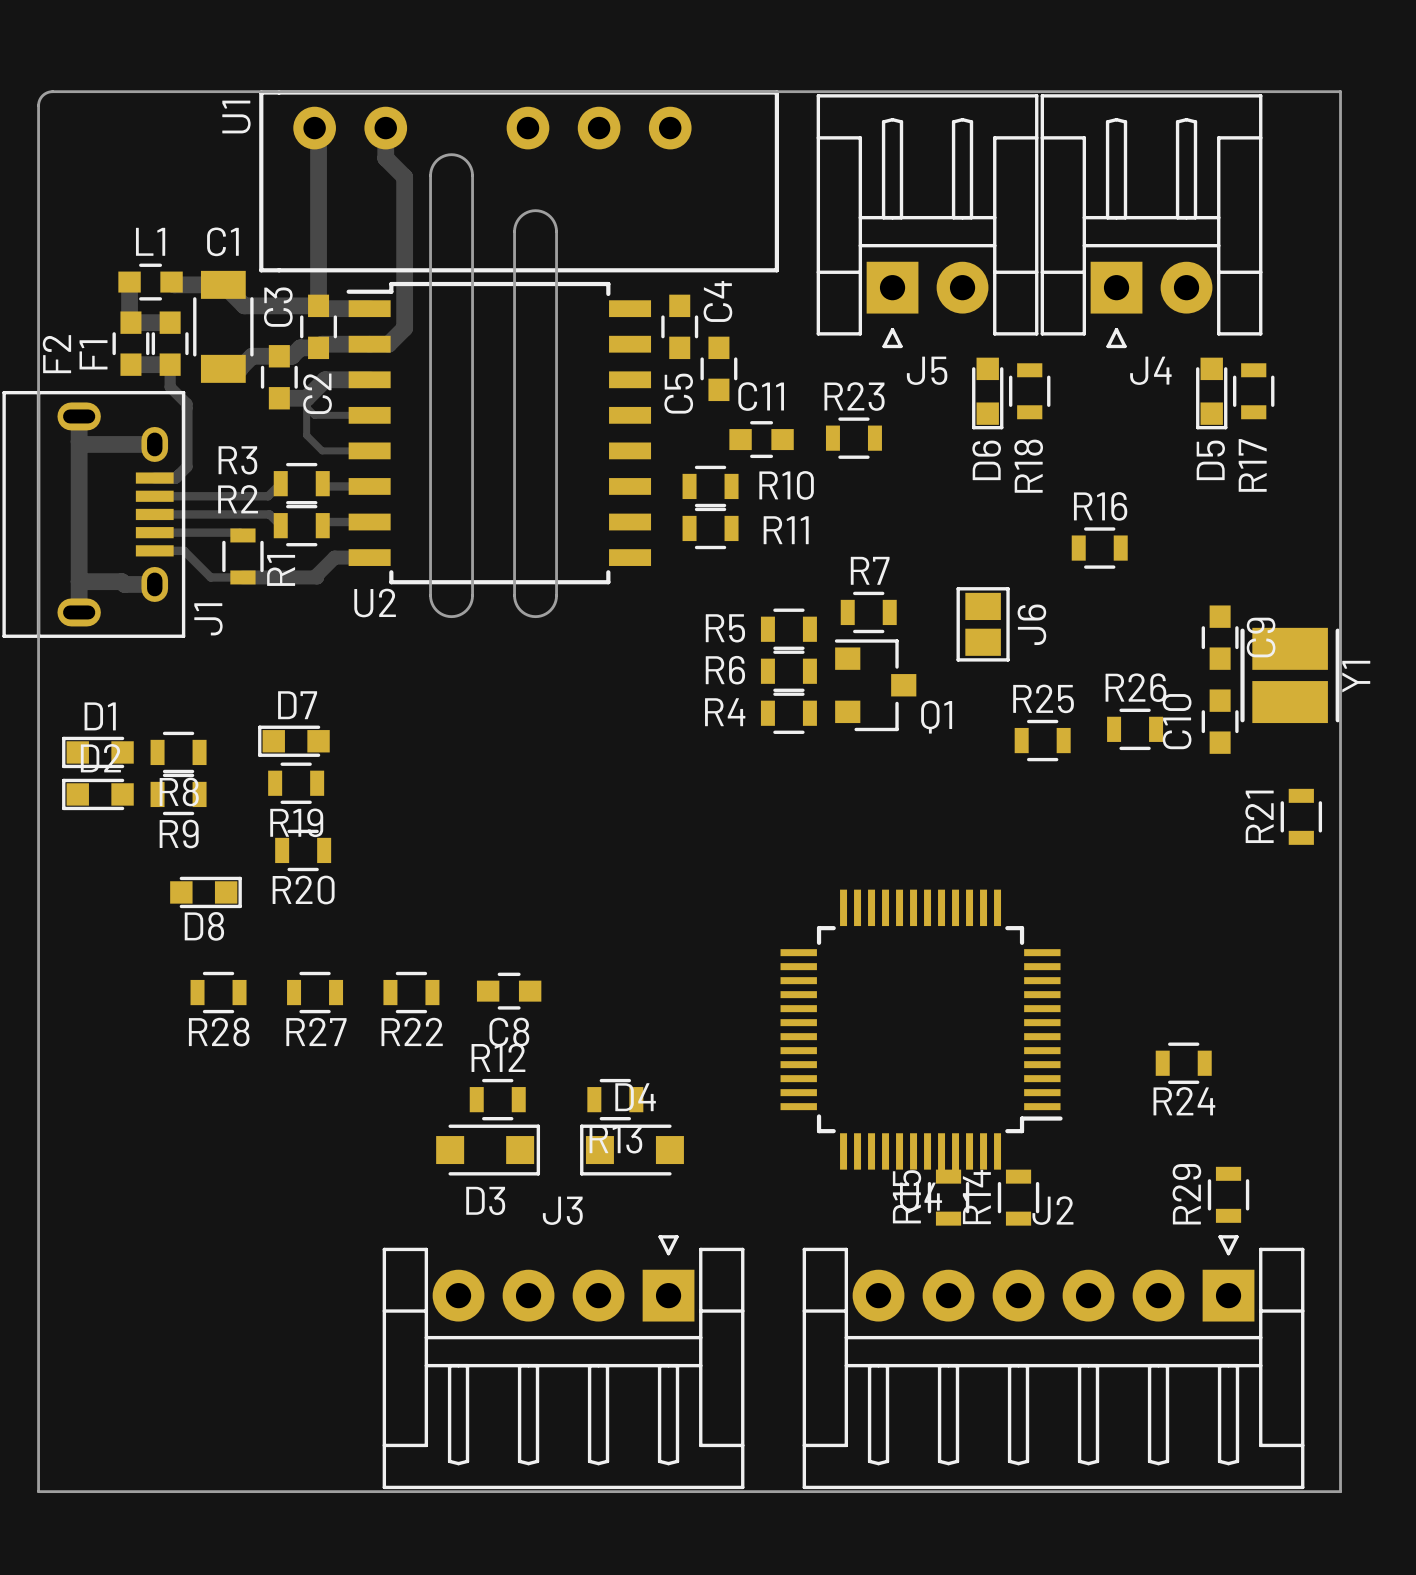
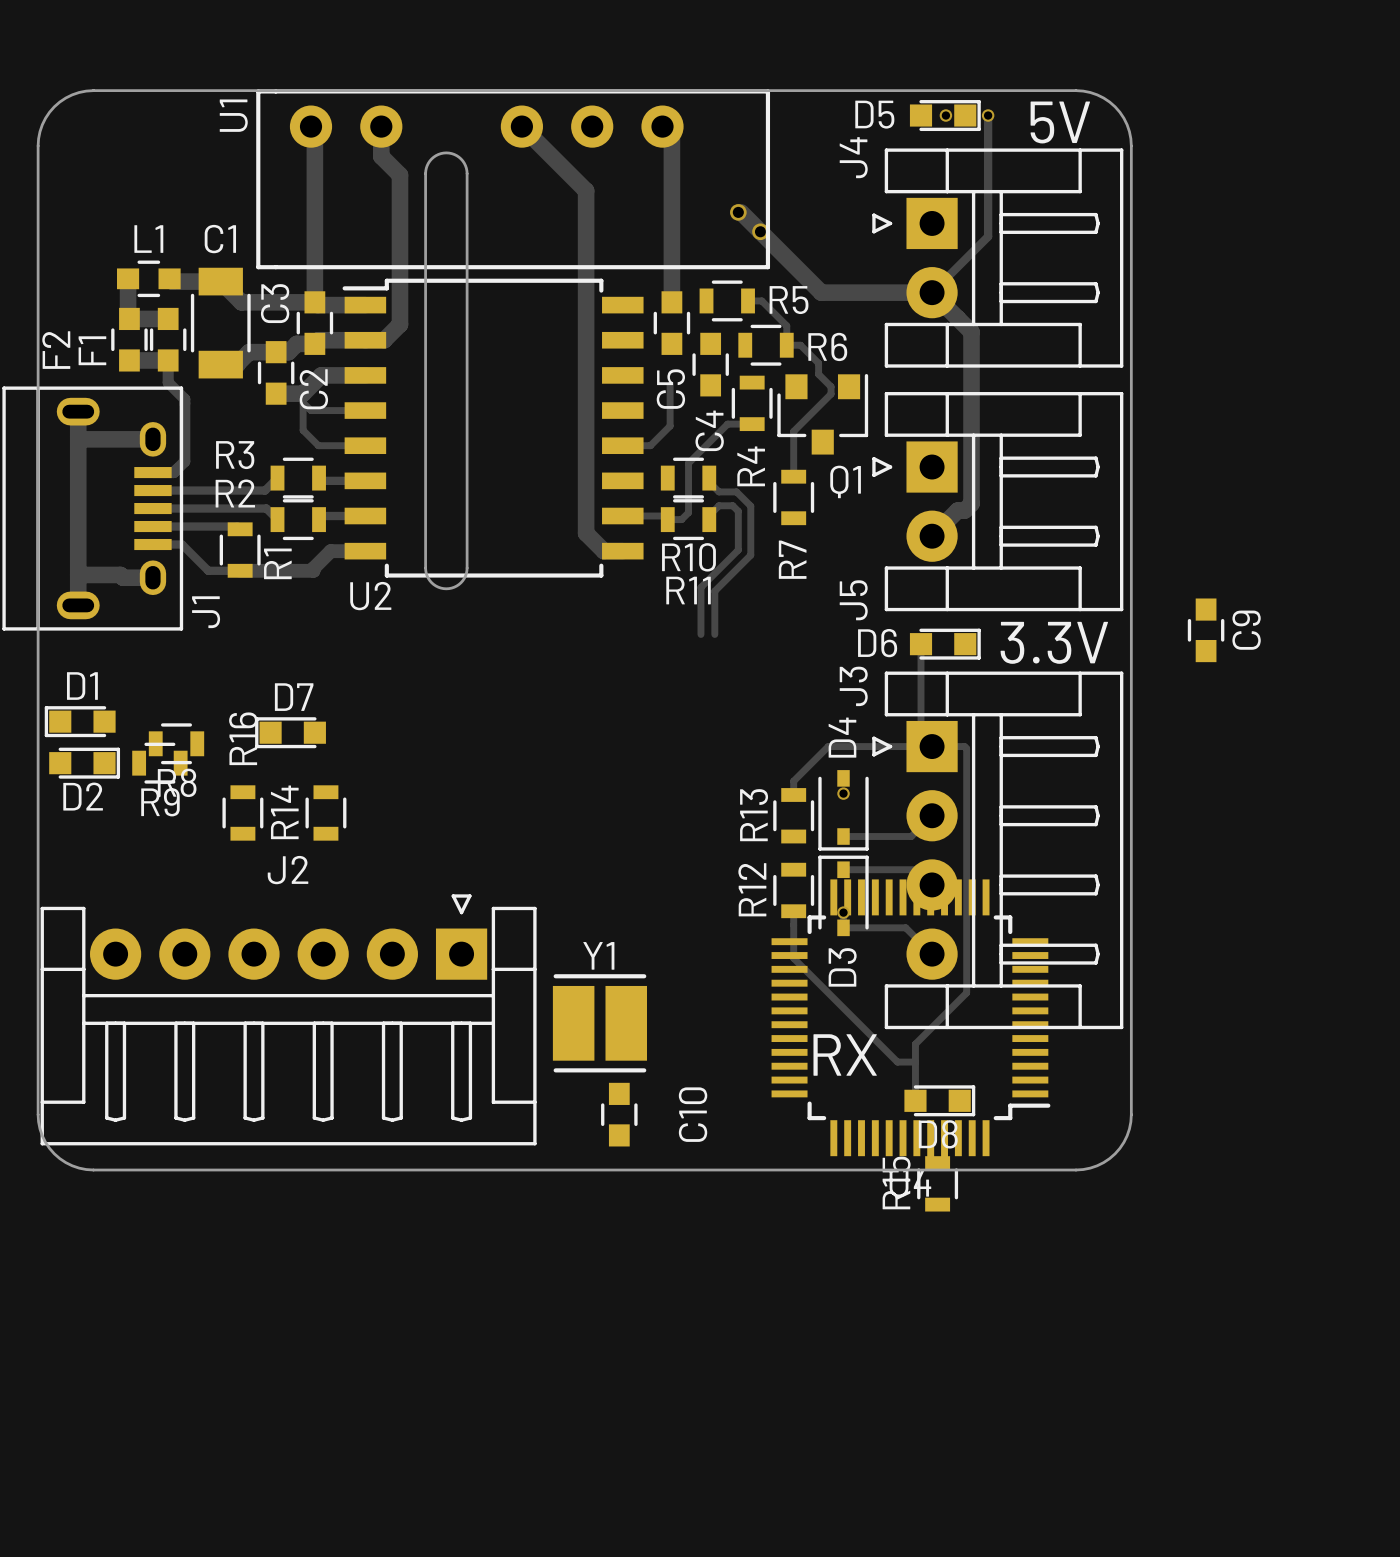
board edge: (94, 91) (50, 91) (42, 95) (38, 103) (38, 147) -> (93, 90) (72, 94) (54, 106) (42, 124) (38, 145)
board edge: (1088, 91) (1340, 91) (1340, 1491) (38, 1491) (38, 1127) -> (1075, 90) (1097, 94) (1115, 106) (1127, 124) (1131, 145) (1131, 1114) (1127, 1135) (1115, 1153) (1097, 1165) (1075, 1170) (93, 1170) (72, 1165) (54, 1153) (42, 1135) (38, 1114)
via: none -> (945, 115)
track: none -> (988, 115) (988, 236) (932, 292)
via: none -> (988, 115)
text: none -> 5V (1060, 122)
track: none -> (521, 126) (586, 190) (586, 533) (603, 551) (622, 551)
track: none -> (662, 126) (671, 136) (671, 302)
via: none -> (738, 212)
track: none -> (741, 212) (821, 292) (932, 292)
J5 rotation: 0° (927, 221) -> 90° clockwise (997, 501)
J5 position: (927, 221) -> (997, 501)
J4 rotation: 0° (1151, 221) -> 90° clockwise (997, 258)
board edge: (514, 231) (514, 595) (516, 603) (520, 610) (527, 615) (535, 616) (543, 615) (550, 610) (554, 603) (556, 595) (556, 231) (554, 223) (550, 216) (543, 212) (535, 210) (527, 212) (520, 216) (516, 223) (514, 231) -> none
via: none -> (760, 231)
track: none -> (932, 292) (971, 332) (971, 503) (964, 510) (957, 510) (932, 536)
C4 name position: C4 (717, 301) -> C4 (709, 430)
track: none -> (748, 300) (761, 300) (786, 325) (786, 345) (800, 345) (818, 363) (818, 374) (831, 386) (831, 394) (793, 431) (793, 476)
J5 name position: J5 (927, 370) -> J5 (853, 600)
J4 name position: J4 (1150, 370) -> J4 (853, 157)
track: none -> (670, 385) (670, 426) (650, 445) (622, 445)
R18: (1029, 391) -> none
R17: (1253, 391) -> none
D6 rotation: 0° (987, 393) -> 90° counterclockwise (945, 644)
D6 position: (987, 393) -> (945, 644)
D5 rotation: 0° (1211, 393) -> 90° counterclockwise (945, 115)
D5 position: (1211, 393) -> (945, 115)
track: none -> (752, 424) (727, 424) (688, 463) (688, 512) (681, 519) (667, 519) (664, 516) (622, 516)
R23: (853, 438) -> none
C11: (761, 439) -> none
D6 name position: D6 (986, 460) -> D6 (877, 643)
D5 name position: D5 (1210, 460) -> D5 (874, 114)
track: none -> (709, 478) (709, 482) (718, 491) (736, 491) (750, 506) (750, 555) (714, 591) (714, 634)
R10 name position: R10 (786, 485) -> R10 (688, 557)
R10 position: (710, 486) -> (688, 478)
track: none -> (709, 519) (709, 515) (718, 505) (732, 505) (738, 511) (738, 550) (700, 587) (700, 634)
R11 position: (710, 528) -> (688, 519)
R11 name position: R11 (786, 530) -> R11 (688, 590)
R16 rotation: 0° (1099, 548) -> 90° clockwise (242, 812)
R16 position: (1099, 548) -> (242, 812)
R7 name position: R7 (870, 570) -> R7 (792, 559)
board edge: (430, 574) (430, 598) (433, 606) (441, 613) (451, 616) (462, 613) (469, 606) (472, 598) (472, 574) -> (425, 568) (427, 575) (431, 582) (438, 587) (446, 588) (454, 587) (461, 582) (465, 575) (467, 568)
R7 rotation: 0° (868, 612) -> 90° clockwise (793, 497)
R7 position: (868, 612) -> (793, 497)
J6: (983, 624) -> none
R5 name position: R5 (725, 628) -> R5 (789, 300)
R5 position: (788, 629) -> (727, 300)
text: none -> 3.3V (1054, 642)
track: none -> (921, 644) (921, 735) (932, 746)
R6 name position: R6 (725, 670) -> R6 (827, 346)
R6 position: (788, 671) -> (766, 345)
Y1 rotation: 0° (1290, 675) -> 90° clockwise (599, 1023)
Y1 position: (1290, 675) -> (599, 1023)
Y1 name position: Y1 (1356, 676) -> Y1 (598, 955)
Q1 rotation: 0° (875, 685) -> 90° clockwise (822, 414)
Q1 position: (875, 685) -> (822, 414)
R4 name position: R4 (725, 712) -> R4 (751, 466)
R4 rotation: 0° (788, 713) -> 90° clockwise (752, 403)
R4 position: (788, 713) -> (752, 403)
C10 name position: C10 (1177, 721) -> C10 (693, 1114)
C10 position: (1220, 721) -> (619, 1114)
R26: (1135, 729) -> none
R25: (1042, 740) -> none
D1 position: (97, 752) -> (80, 721)
R19: (296, 783) -> none
D2 rotation: 0° (97, 794) -> 180° (84, 763)
R9 position: (178, 794) -> (159, 763)
via: none -> (843, 793)
track: none -> (793, 794) (793, 781) (828, 746) (964, 746) (966, 748) (966, 992) (915, 1044) (915, 1100)
R21: (1301, 816) -> none
track: none -> (932, 815) (911, 836) (843, 836)
R20: (303, 850) -> none
track: none -> (843, 869) (916, 869) (932, 884)
D8 position: (205, 892) -> (939, 1100)
track: none -> (793, 911) (793, 958) (897, 1062) (915, 1062)
track: none -> (843, 912) (843, 927) (905, 927) (932, 954)
via: none -> (843, 912)
C8: (509, 991) -> none
R28: (218, 992) -> none
R27: (315, 992) -> none
R22: (411, 992) -> none
R12 name position: R12 (498, 1057) -> R12 (752, 889)
R24: (1183, 1063) -> none
text: none -> RX (845, 1054)
R12 rotation: 0° (497, 1099) -> 90° clockwise (793, 890)
R12 position: (497, 1099) -> (793, 890)
R13 rotation: 0° (615, 1099) -> 90° clockwise (793, 815)
R13 position: (615, 1099) -> (793, 815)
D3 footprint: [436, 1124, 541, 1176] -> [818, 855, 869, 937]
D4 footprint: [580, 1124, 684, 1176] -> [818, 770, 869, 851]
R29: (1228, 1194) -> none
R14 position: (1018, 1197) -> (325, 812)
J3 name position: J3 (562, 1210) -> J3 (853, 686)
J3 rotation: 0° (563, 1362) -> 90° counterclockwise (997, 850)
J3 position: (563, 1362) -> (997, 850)
J2 position: (1053, 1362) -> (288, 1019)

